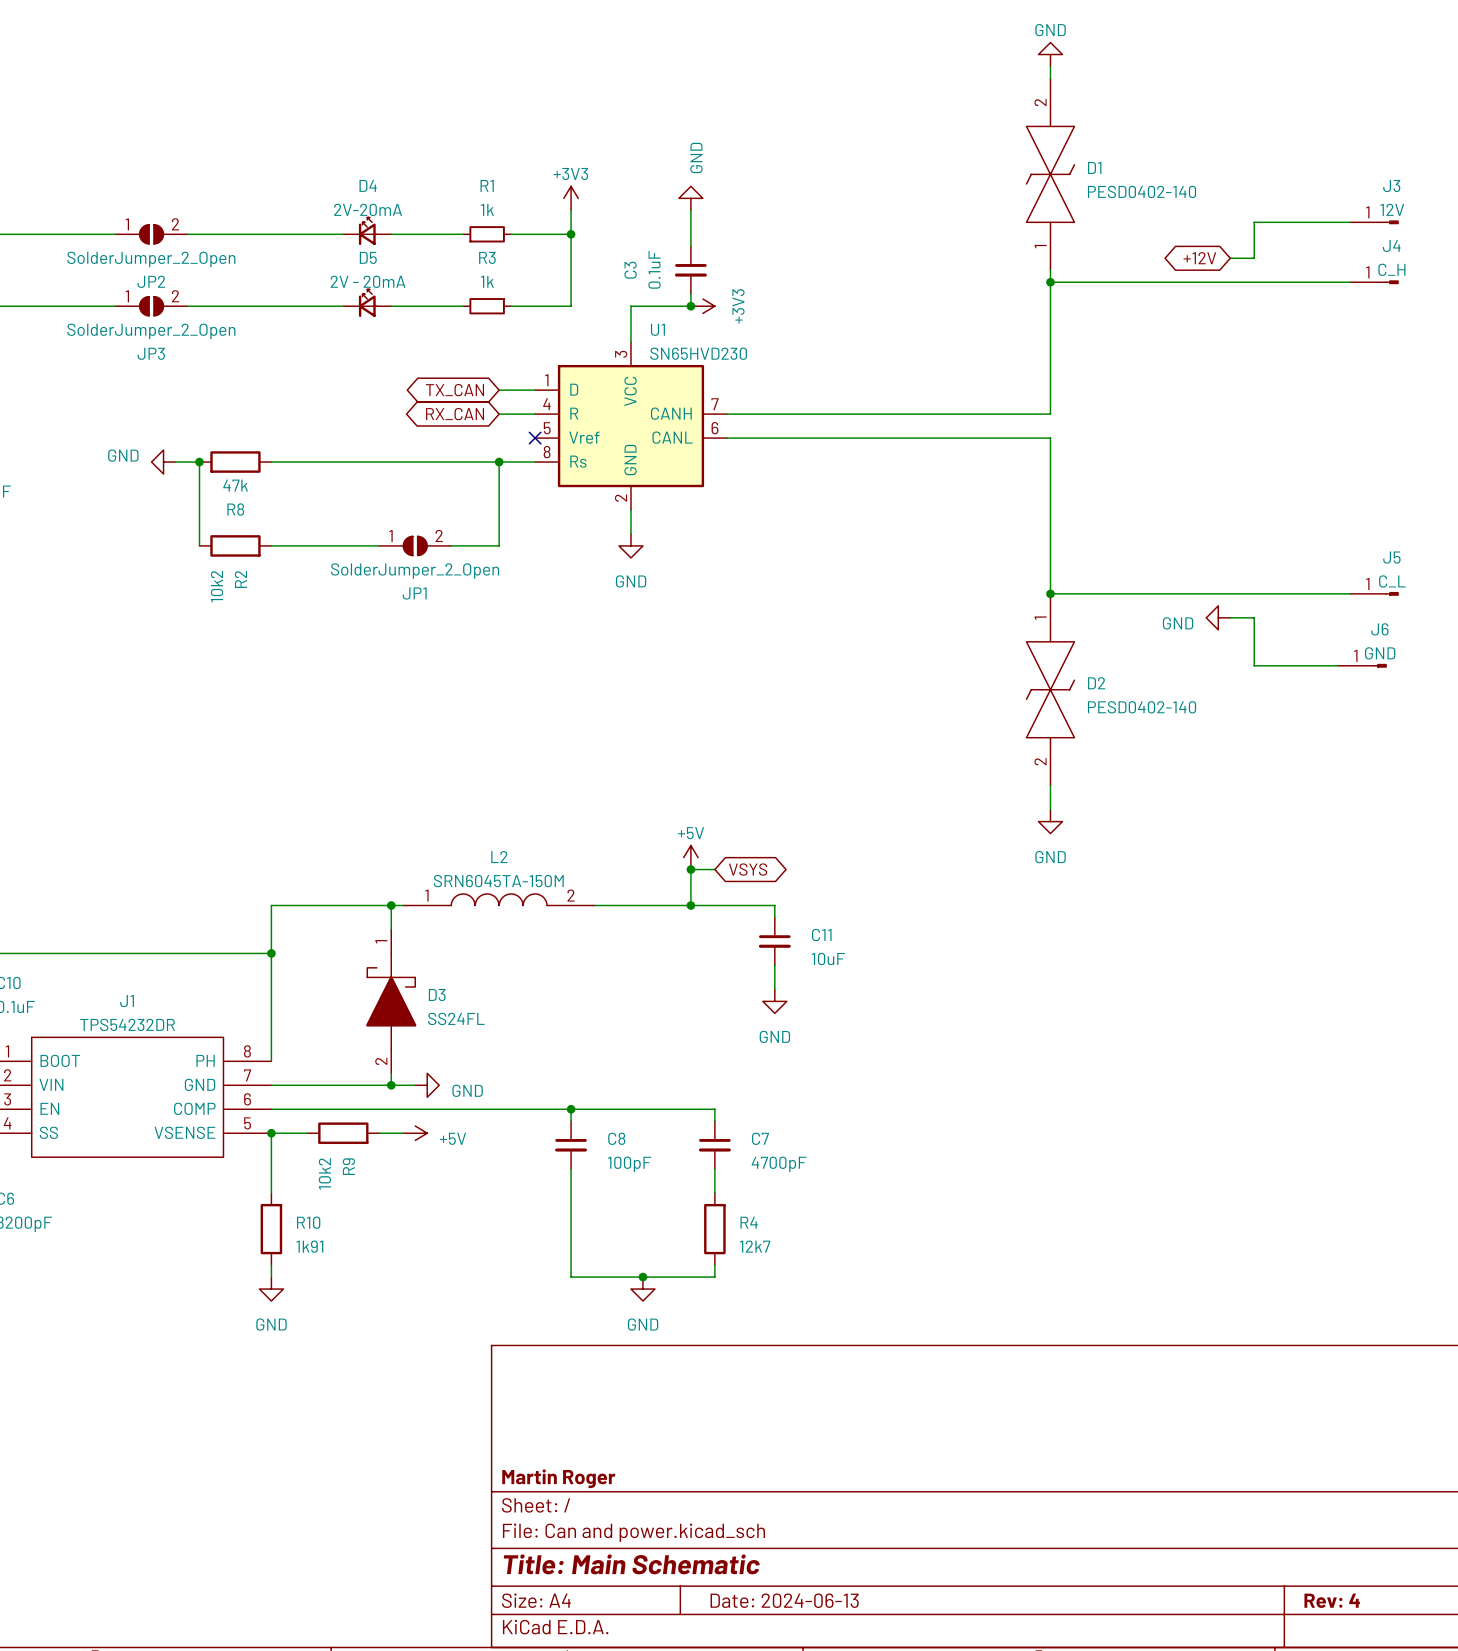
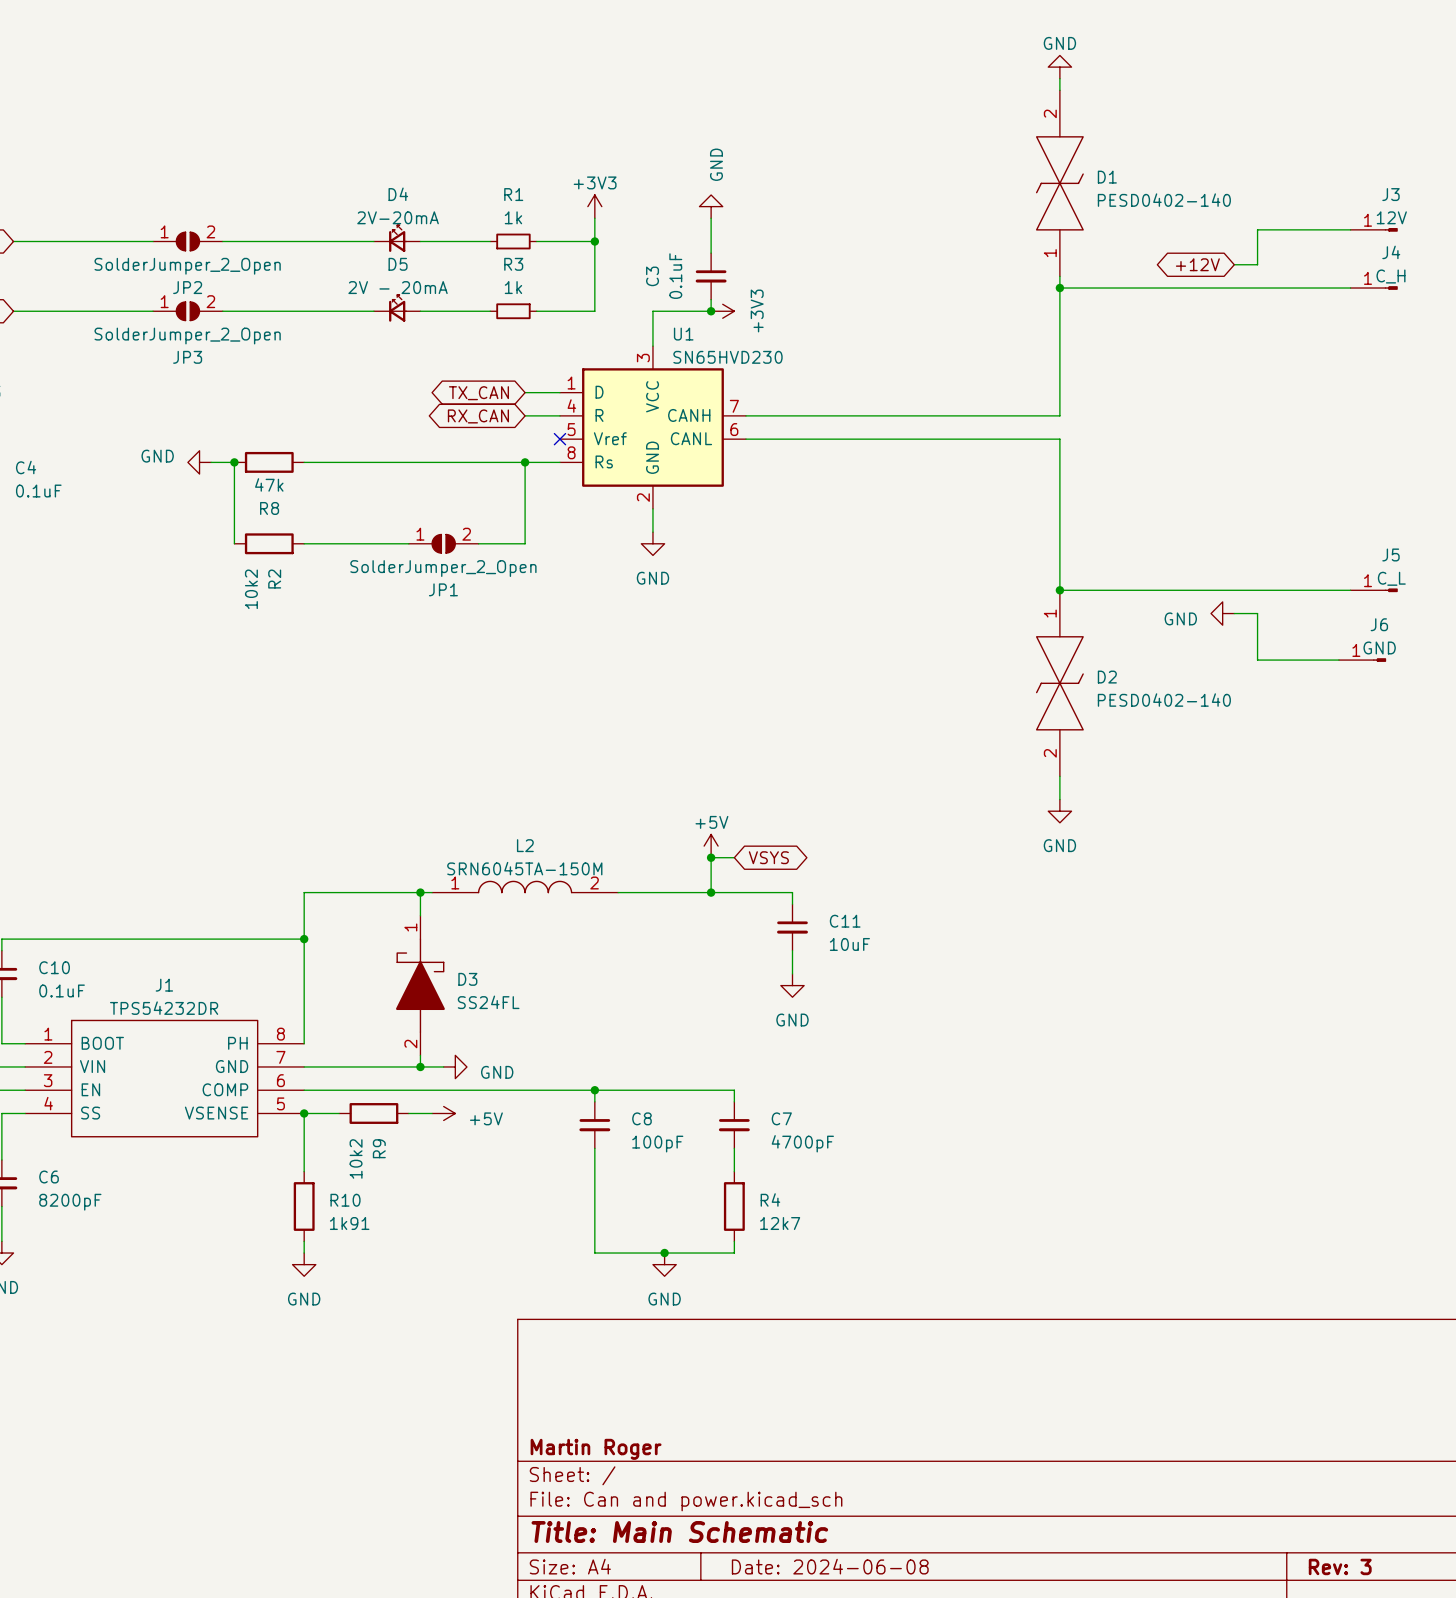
title block: Date: 2024-06-13 (784, 1600) -> Date: 2024-06-08 (830, 1566)
title block: Rev: 4 (1332, 1600) -> Rev: 3 (1340, 1566)

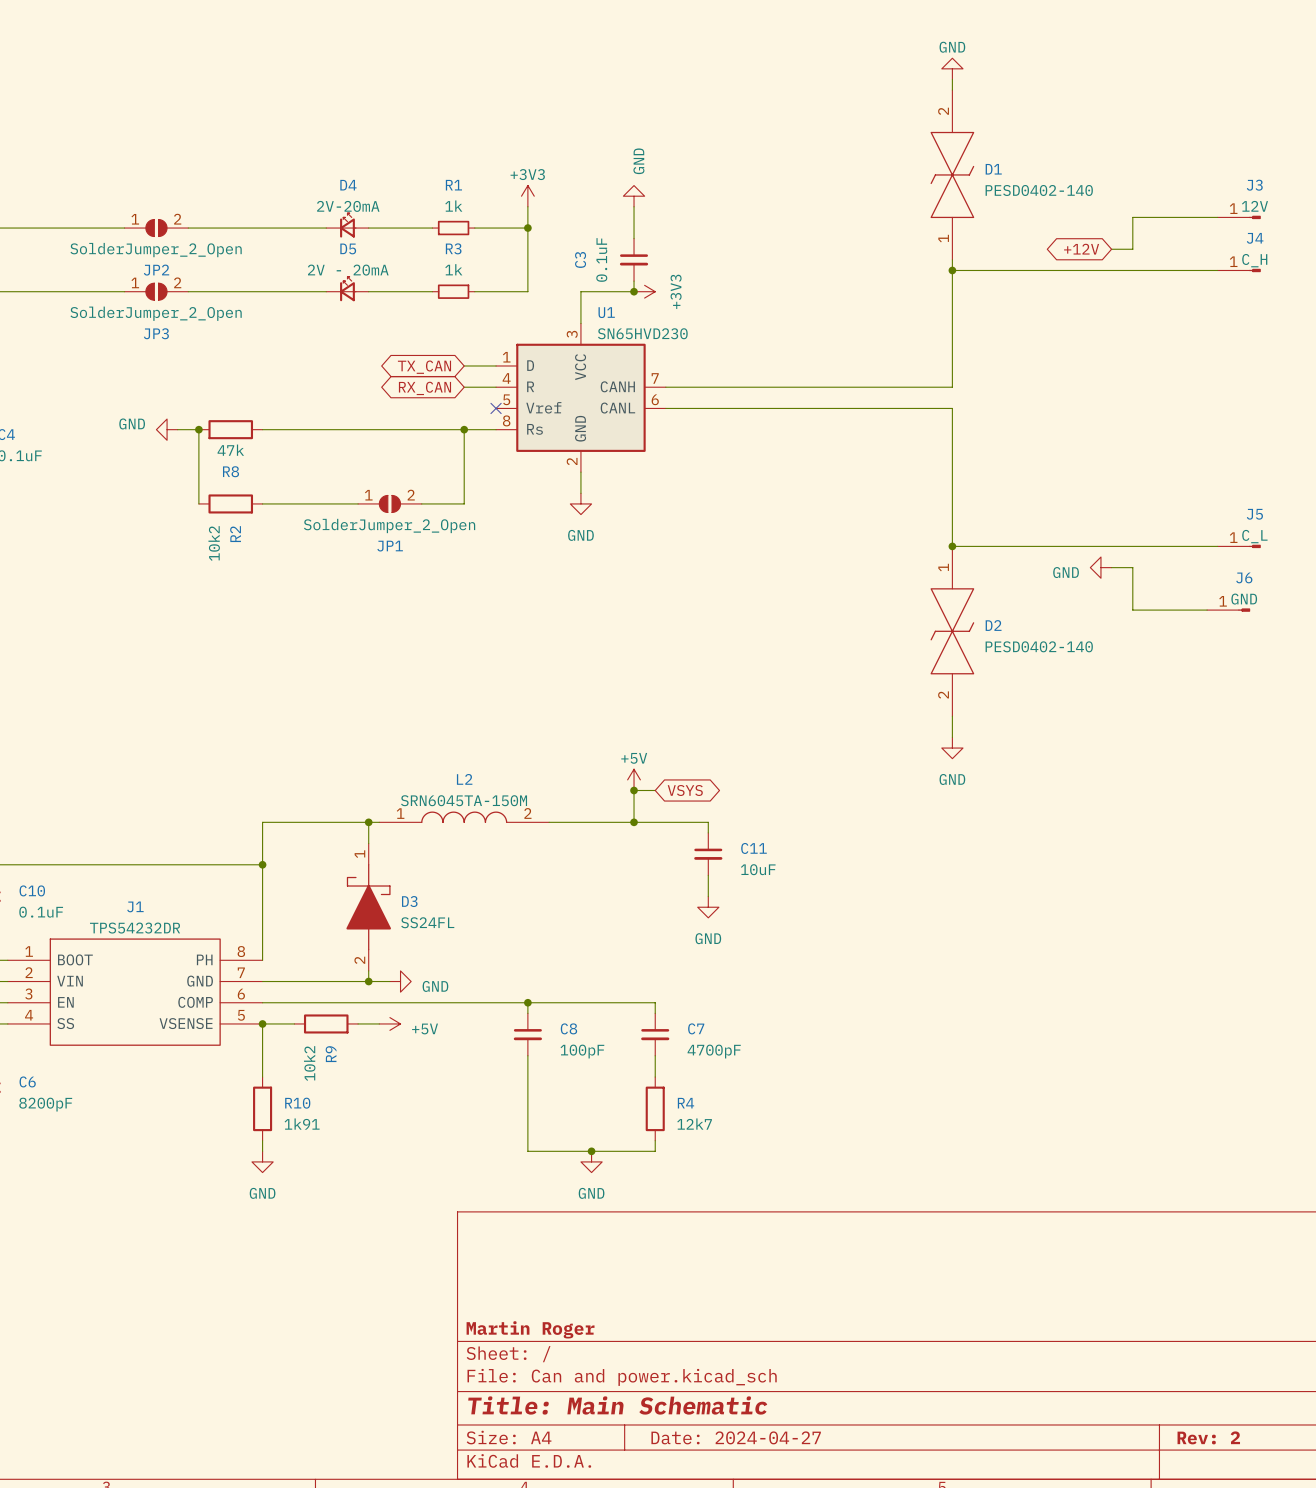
title block: Date: 2024-06-08 (830, 1566) -> Date: 2024-04-27 (736, 1437)
title block: Rev: 3 (1340, 1566) -> Rev: 2 (1208, 1437)

